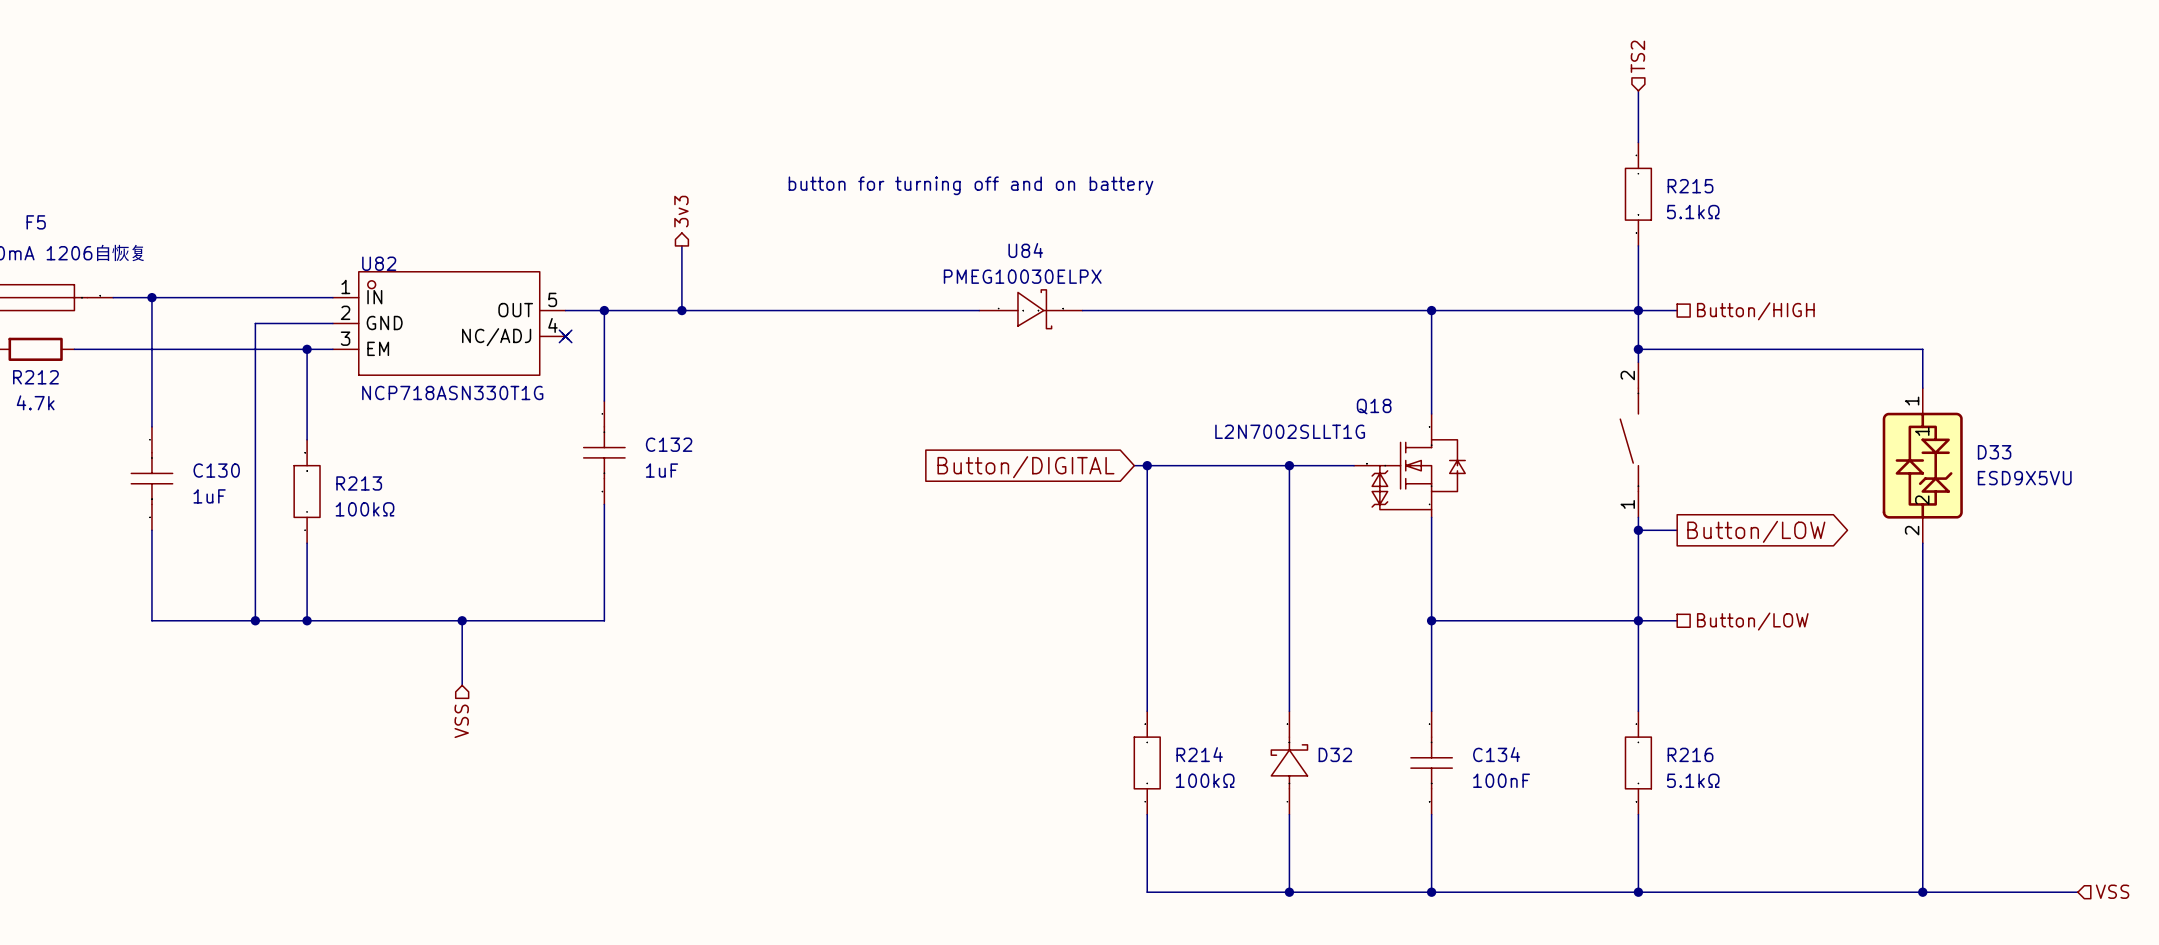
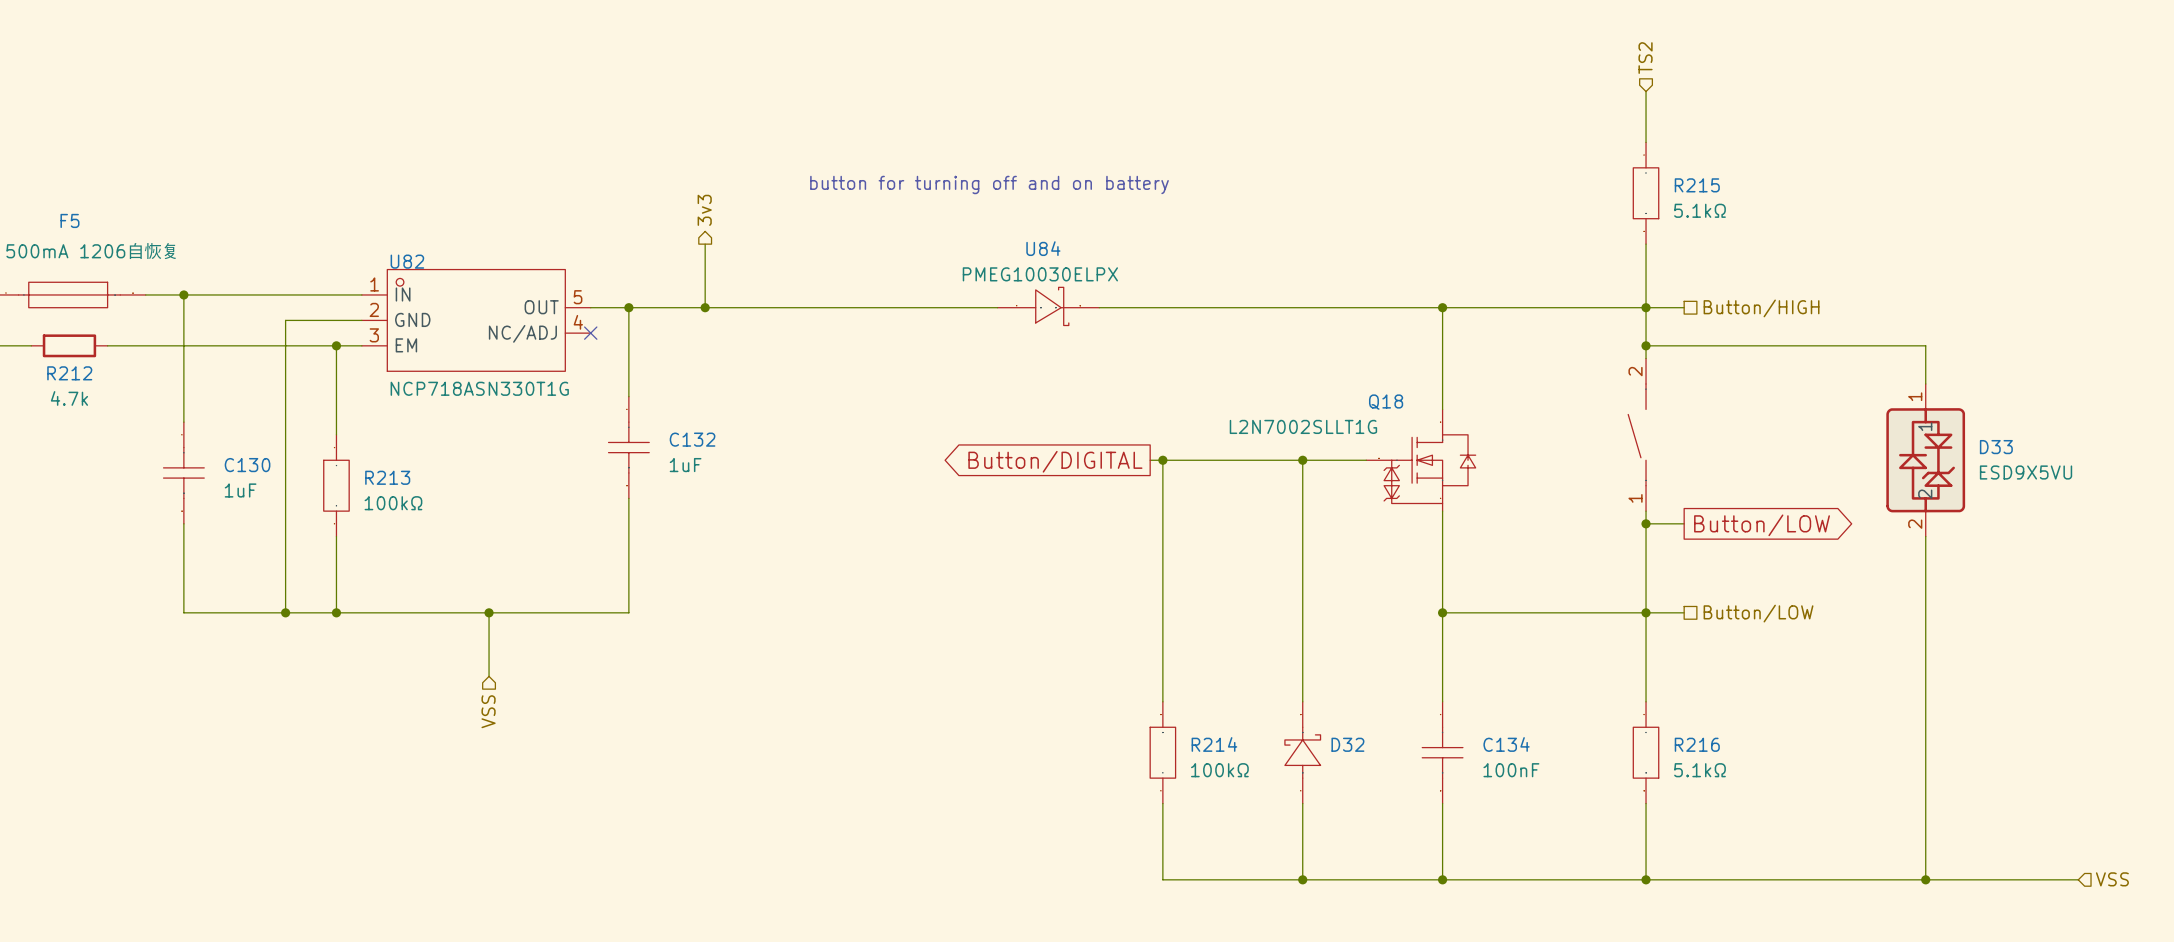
U82 symbol: [332, 271, 569, 376] -> [361, 269, 591, 372]
global label shape: input (1025, 467) -> output (1055, 461)

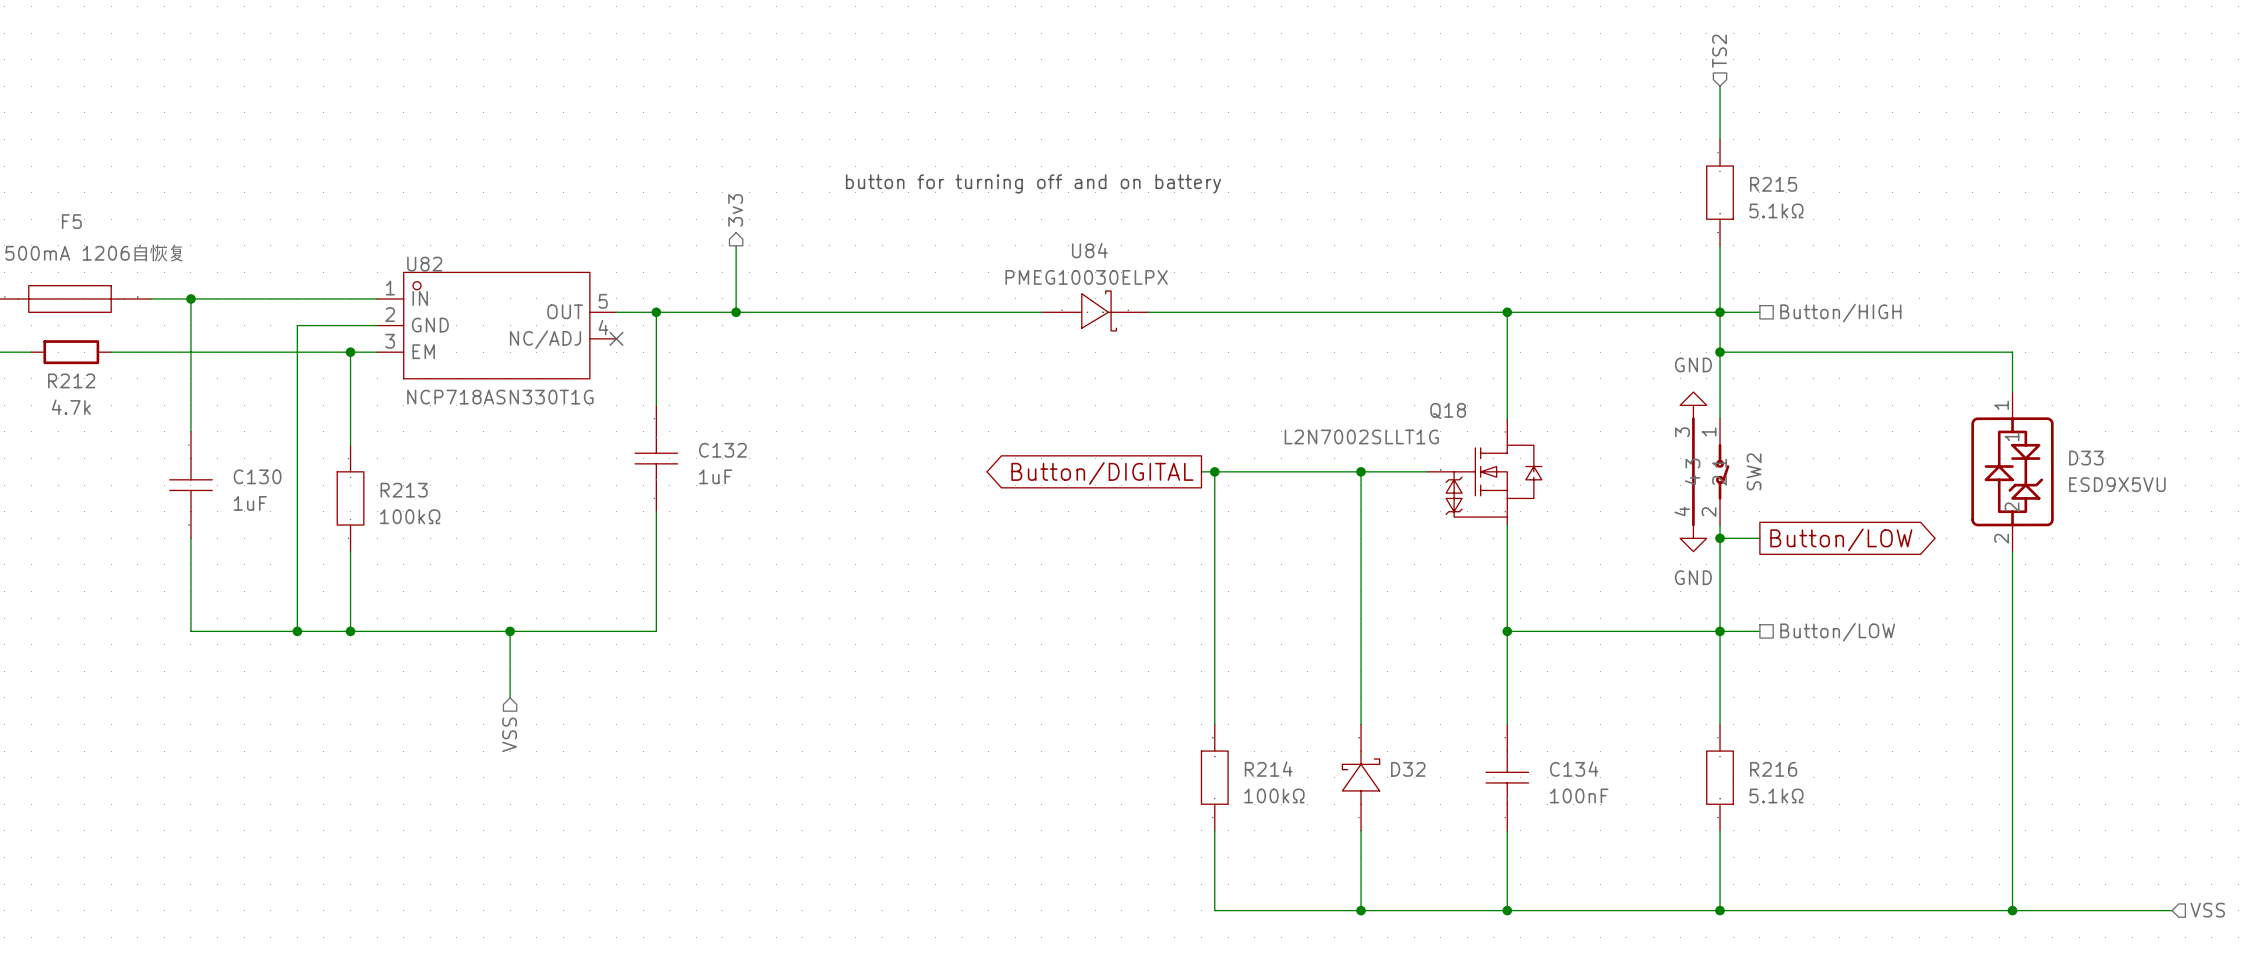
power symbol: none -> GND (1693, 405)
part: (1637, 434) -> none
SW2: none -> (1710, 471)
power symbol: none -> GND (1693, 538)

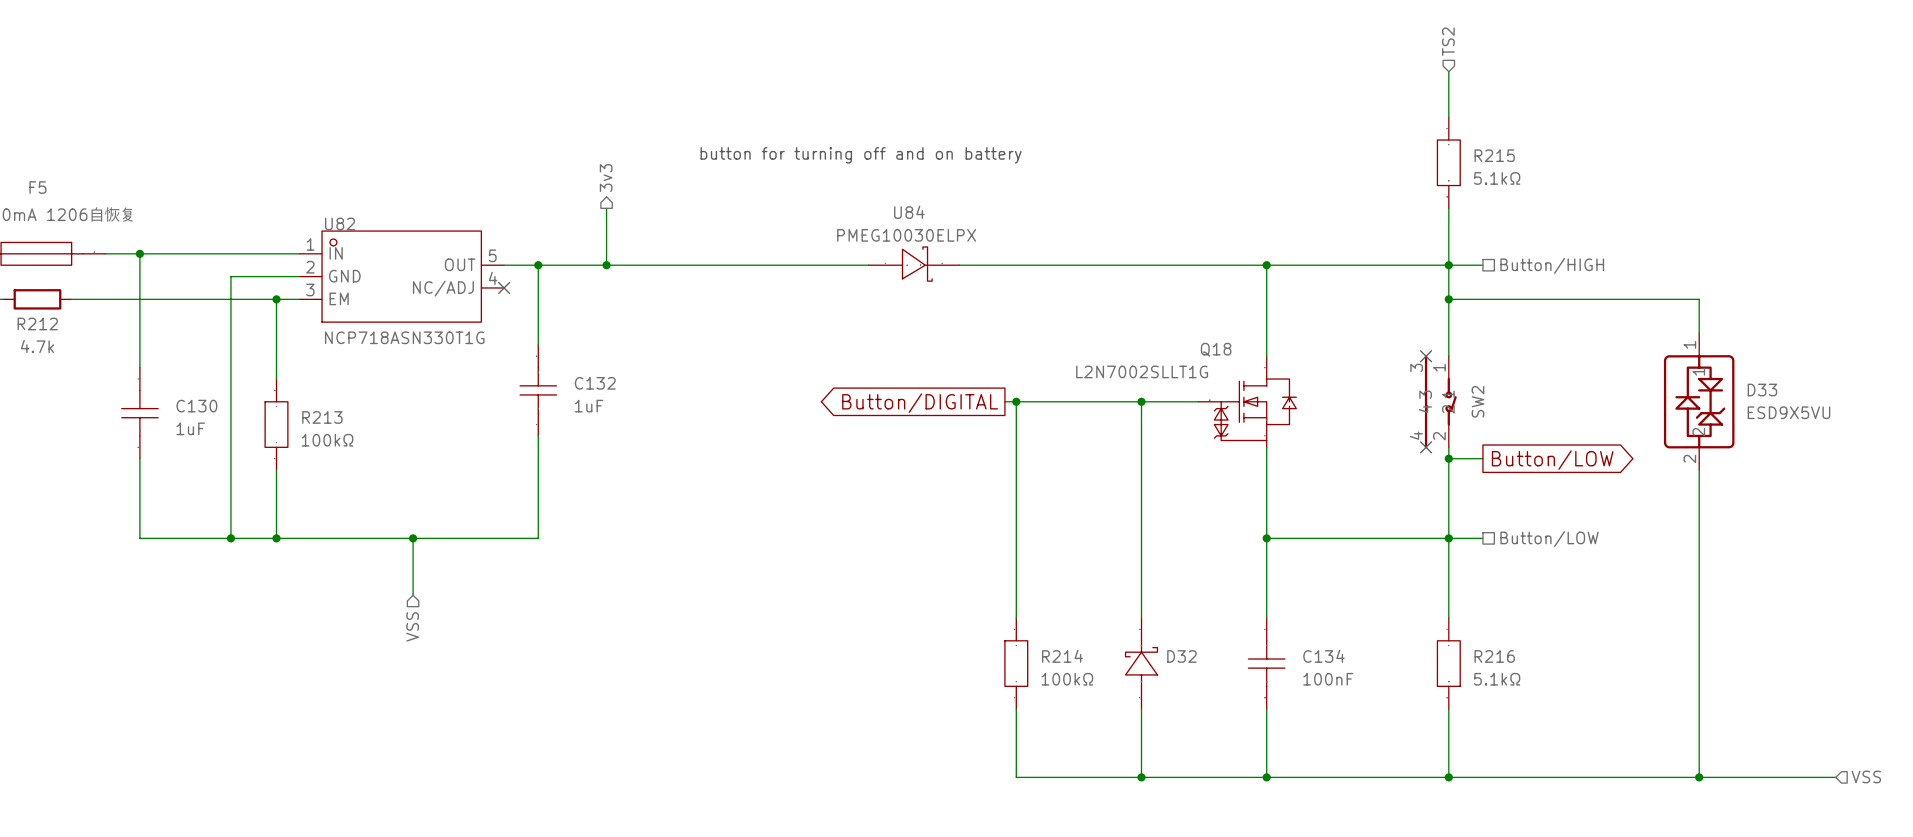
power symbol: GND (1693, 405) -> none
no-connect mark: none -> (1426, 356)
no-connect mark: none -> (1426, 447)
power symbol: GND (1693, 538) -> none

